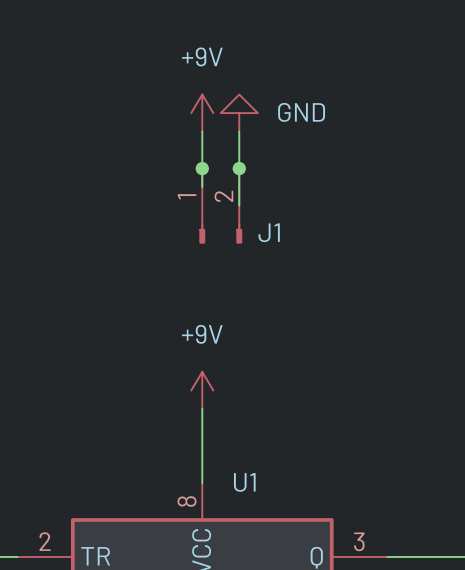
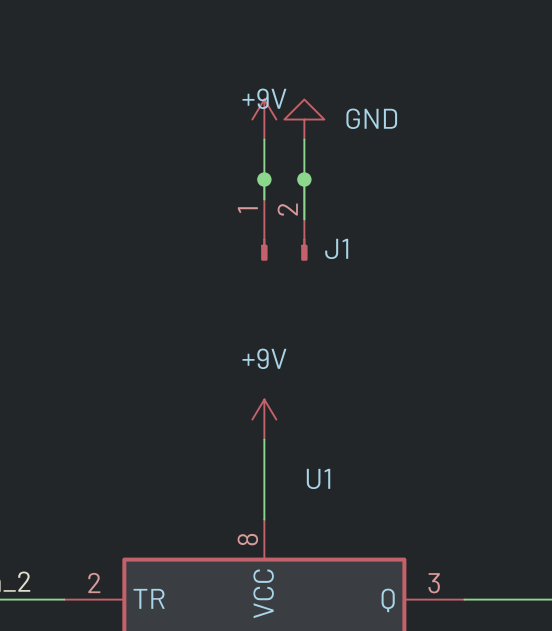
power symbol text position: +9V (202, 56) -> +9V (264, 98)
U1 name position: U1 (244, 482) -> U1 (318, 478)

